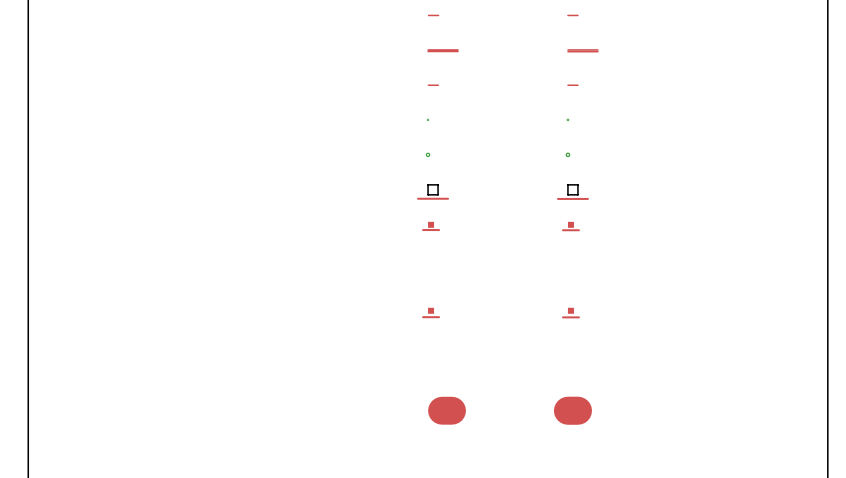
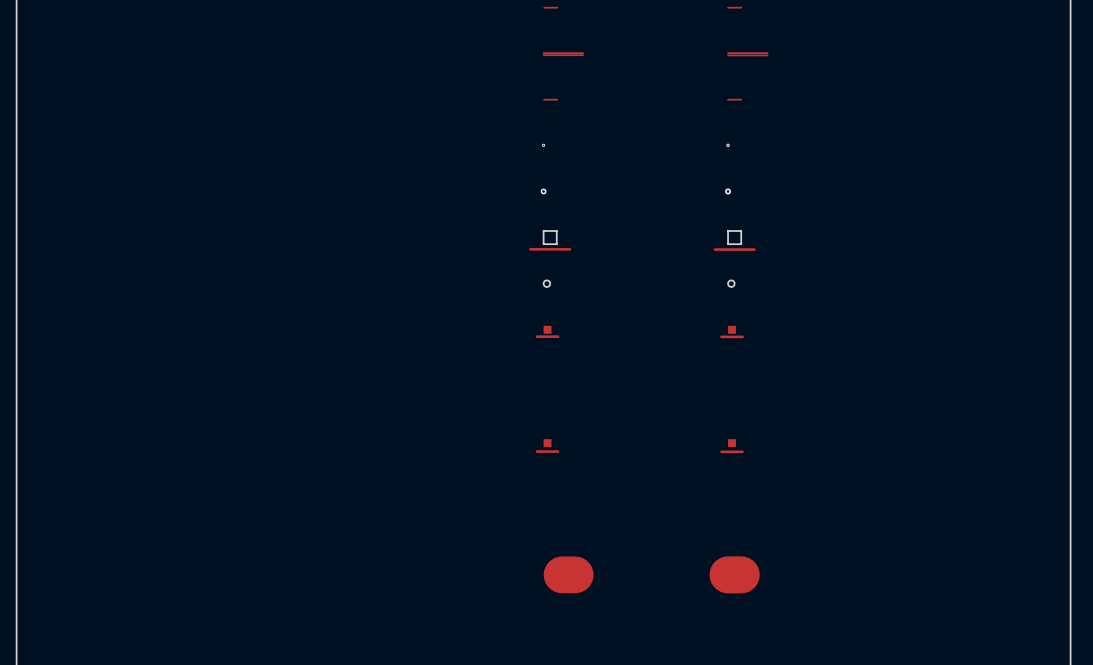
part footprint: [428, 221, 435, 228] -> [543, 280, 551, 287]
part footprint: [567, 221, 574, 228] -> [728, 280, 735, 287]
top track: (423, 230) (439, 230) -> (537, 336) (558, 336)
top track: (562, 230) (578, 230) -> (721, 336) (742, 336)
part: none -> (547, 329)
part: none -> (732, 329)
part: (431, 310) -> none
part: (570, 310) -> none
top track: (423, 317) (439, 317) -> (537, 451) (558, 451)
top track: (562, 317) (578, 317) -> (721, 451) (742, 451)
part: none -> (547, 443)
part: none -> (732, 443)
top track: (442, 410) (452, 410) -> (562, 574) (575, 574)
top track: (567, 410) (577, 410) -> (728, 574) (741, 574)

